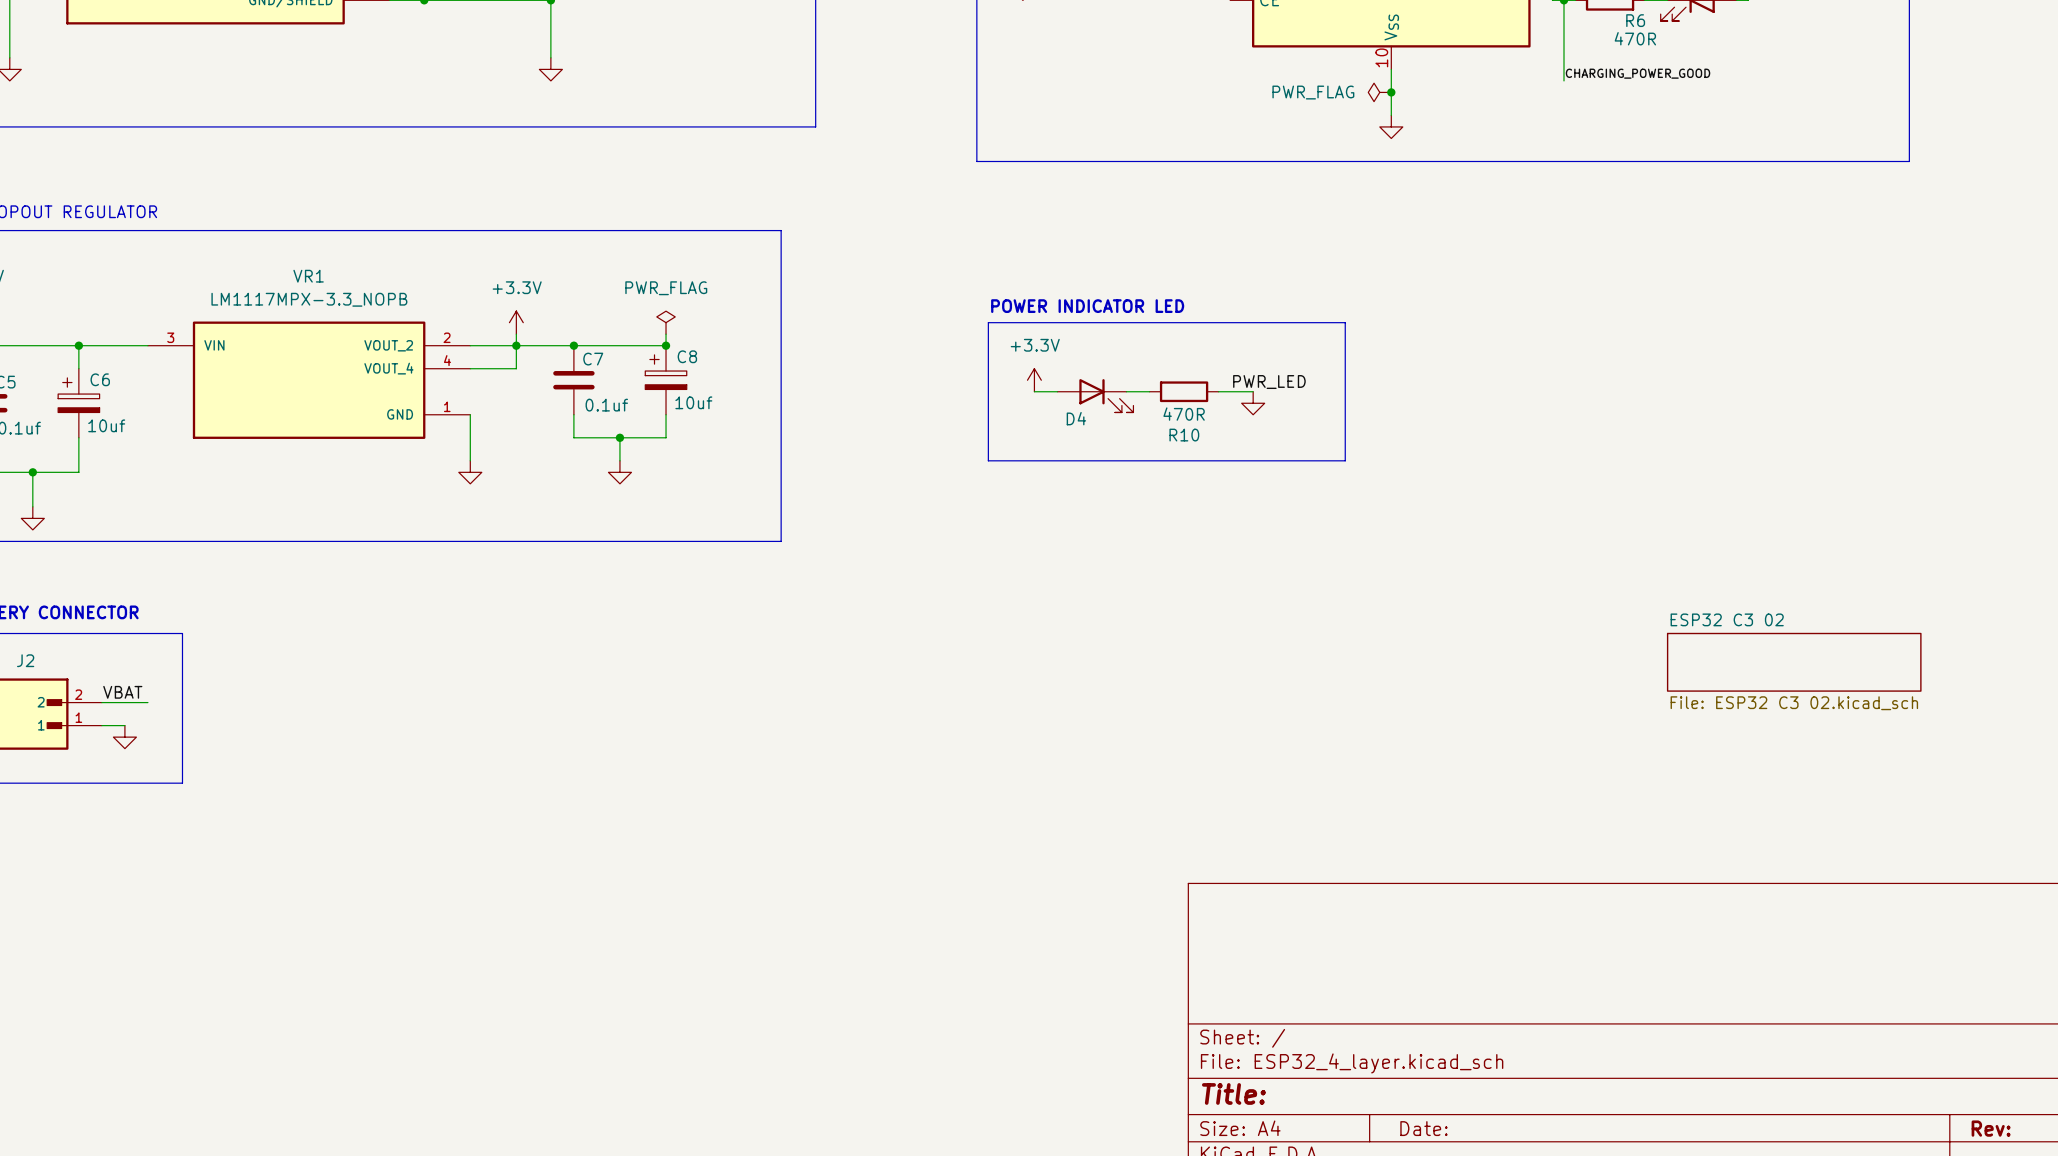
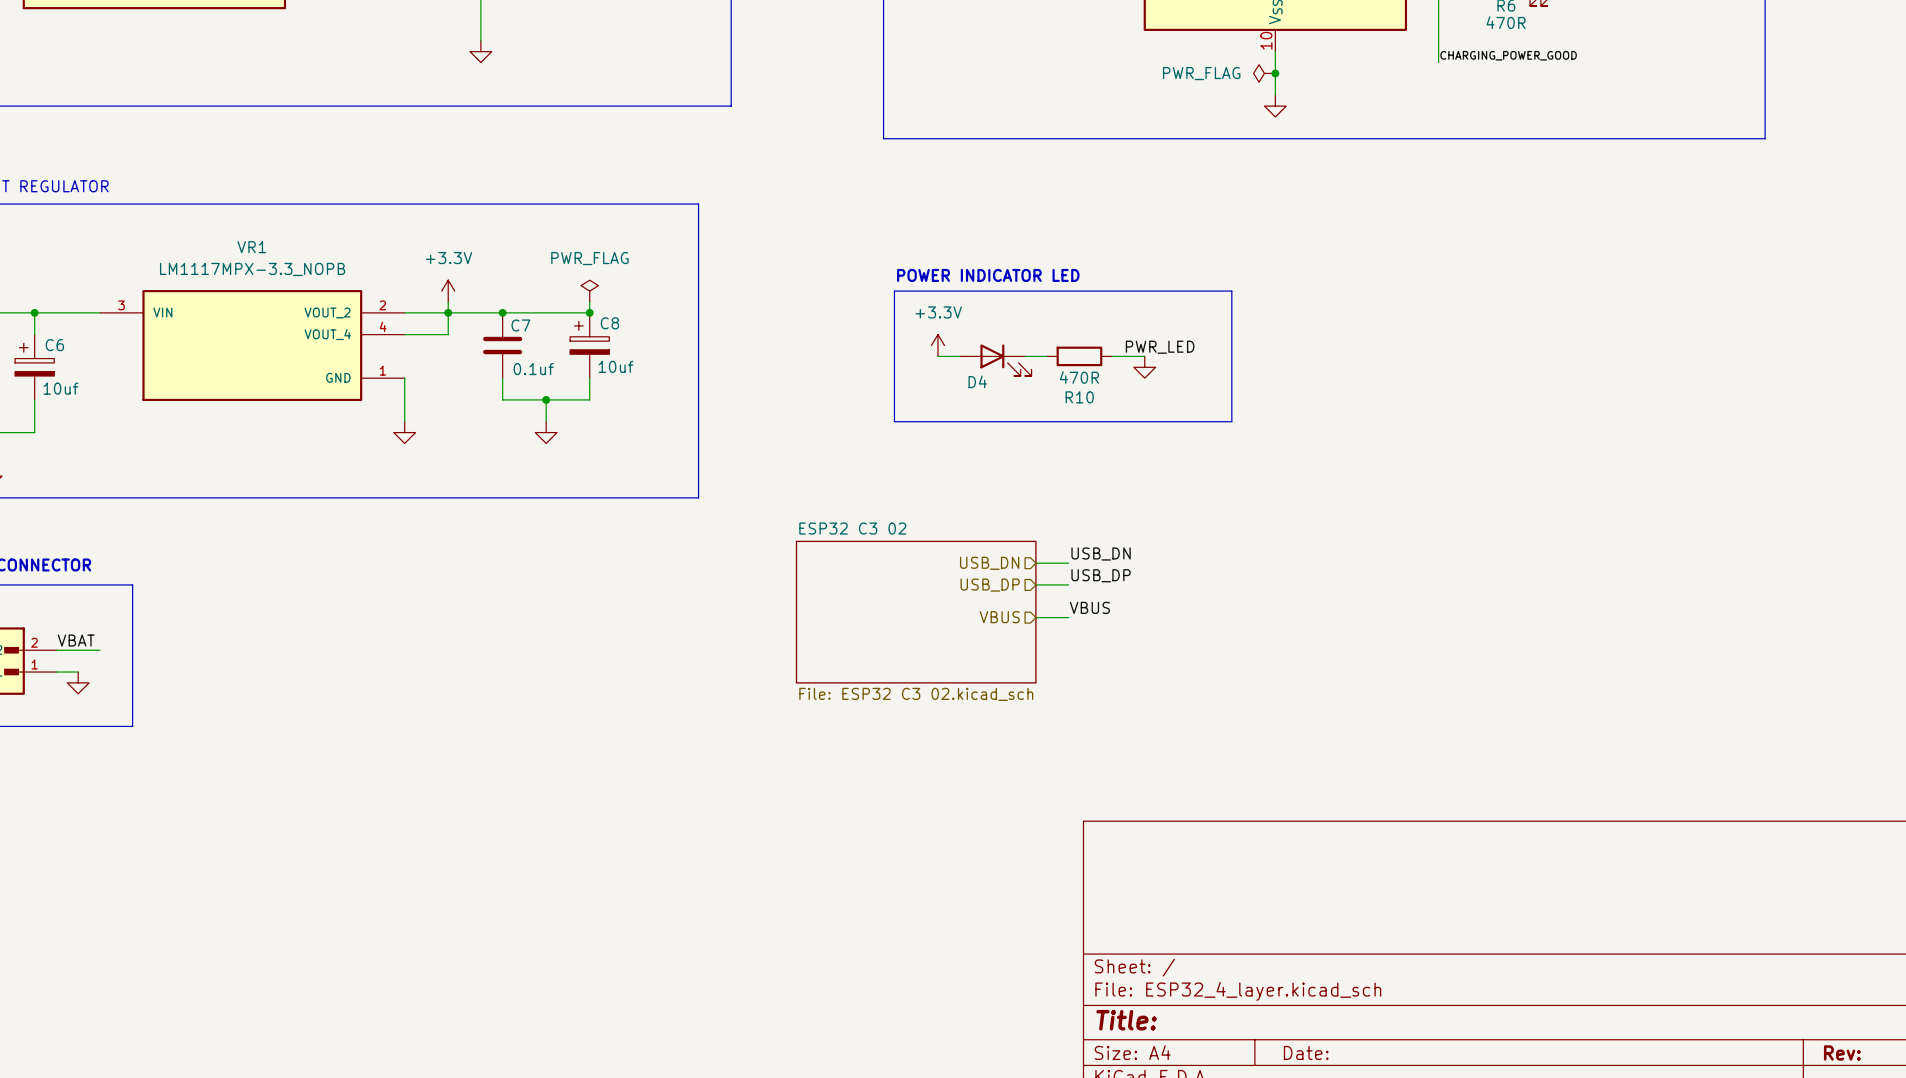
label: none -> USB_DN (1101, 553)
hierarchical label: none -> USB_DN (989, 563)
wire: none -> (1035, 563) (1068, 563)
sheet ESP32 C3 02 name position: ESP32 C3 02 (1727, 619) -> ESP32 C3 02 (852, 528)
label: none -> USB_DP (1101, 575)
sheet ESP32 C3 02 shape: [1666, 632, 1922, 692] -> [795, 540, 1037, 684]
hierarchical label: none -> USB_DP (990, 585)
wire: none -> (1035, 584) (1068, 584)
label: none -> VBUS (1089, 607)
hierarchical label: none -> VBUS (999, 617)
wire: none -> (1035, 617) (1068, 617)
sheet ESP32 C3 02 value position: File: ESP32 C3 02.kicad_sch (1794, 703) -> File: ESP32 C3 02.kicad_sch (916, 694)

